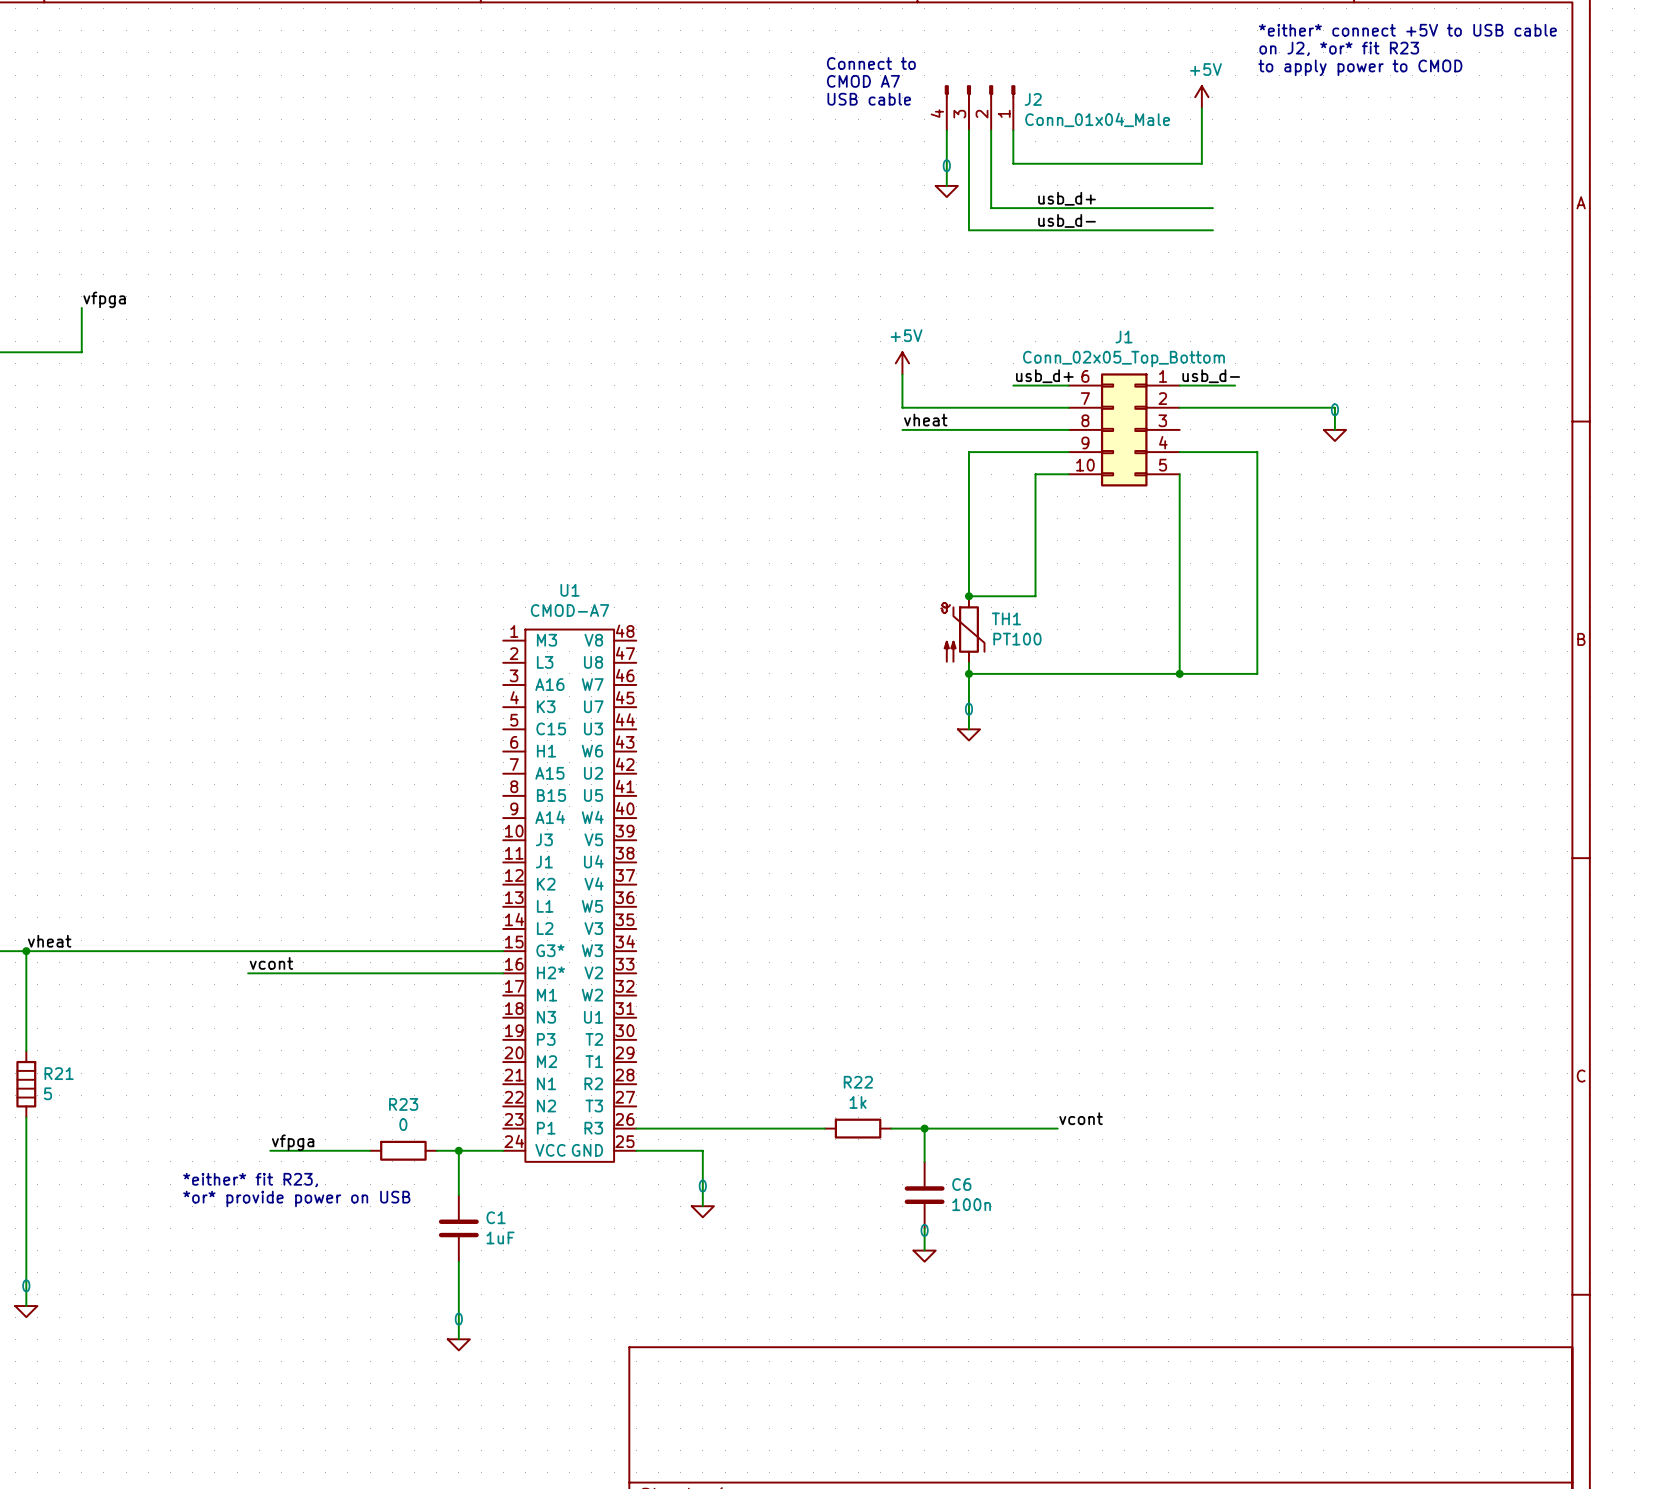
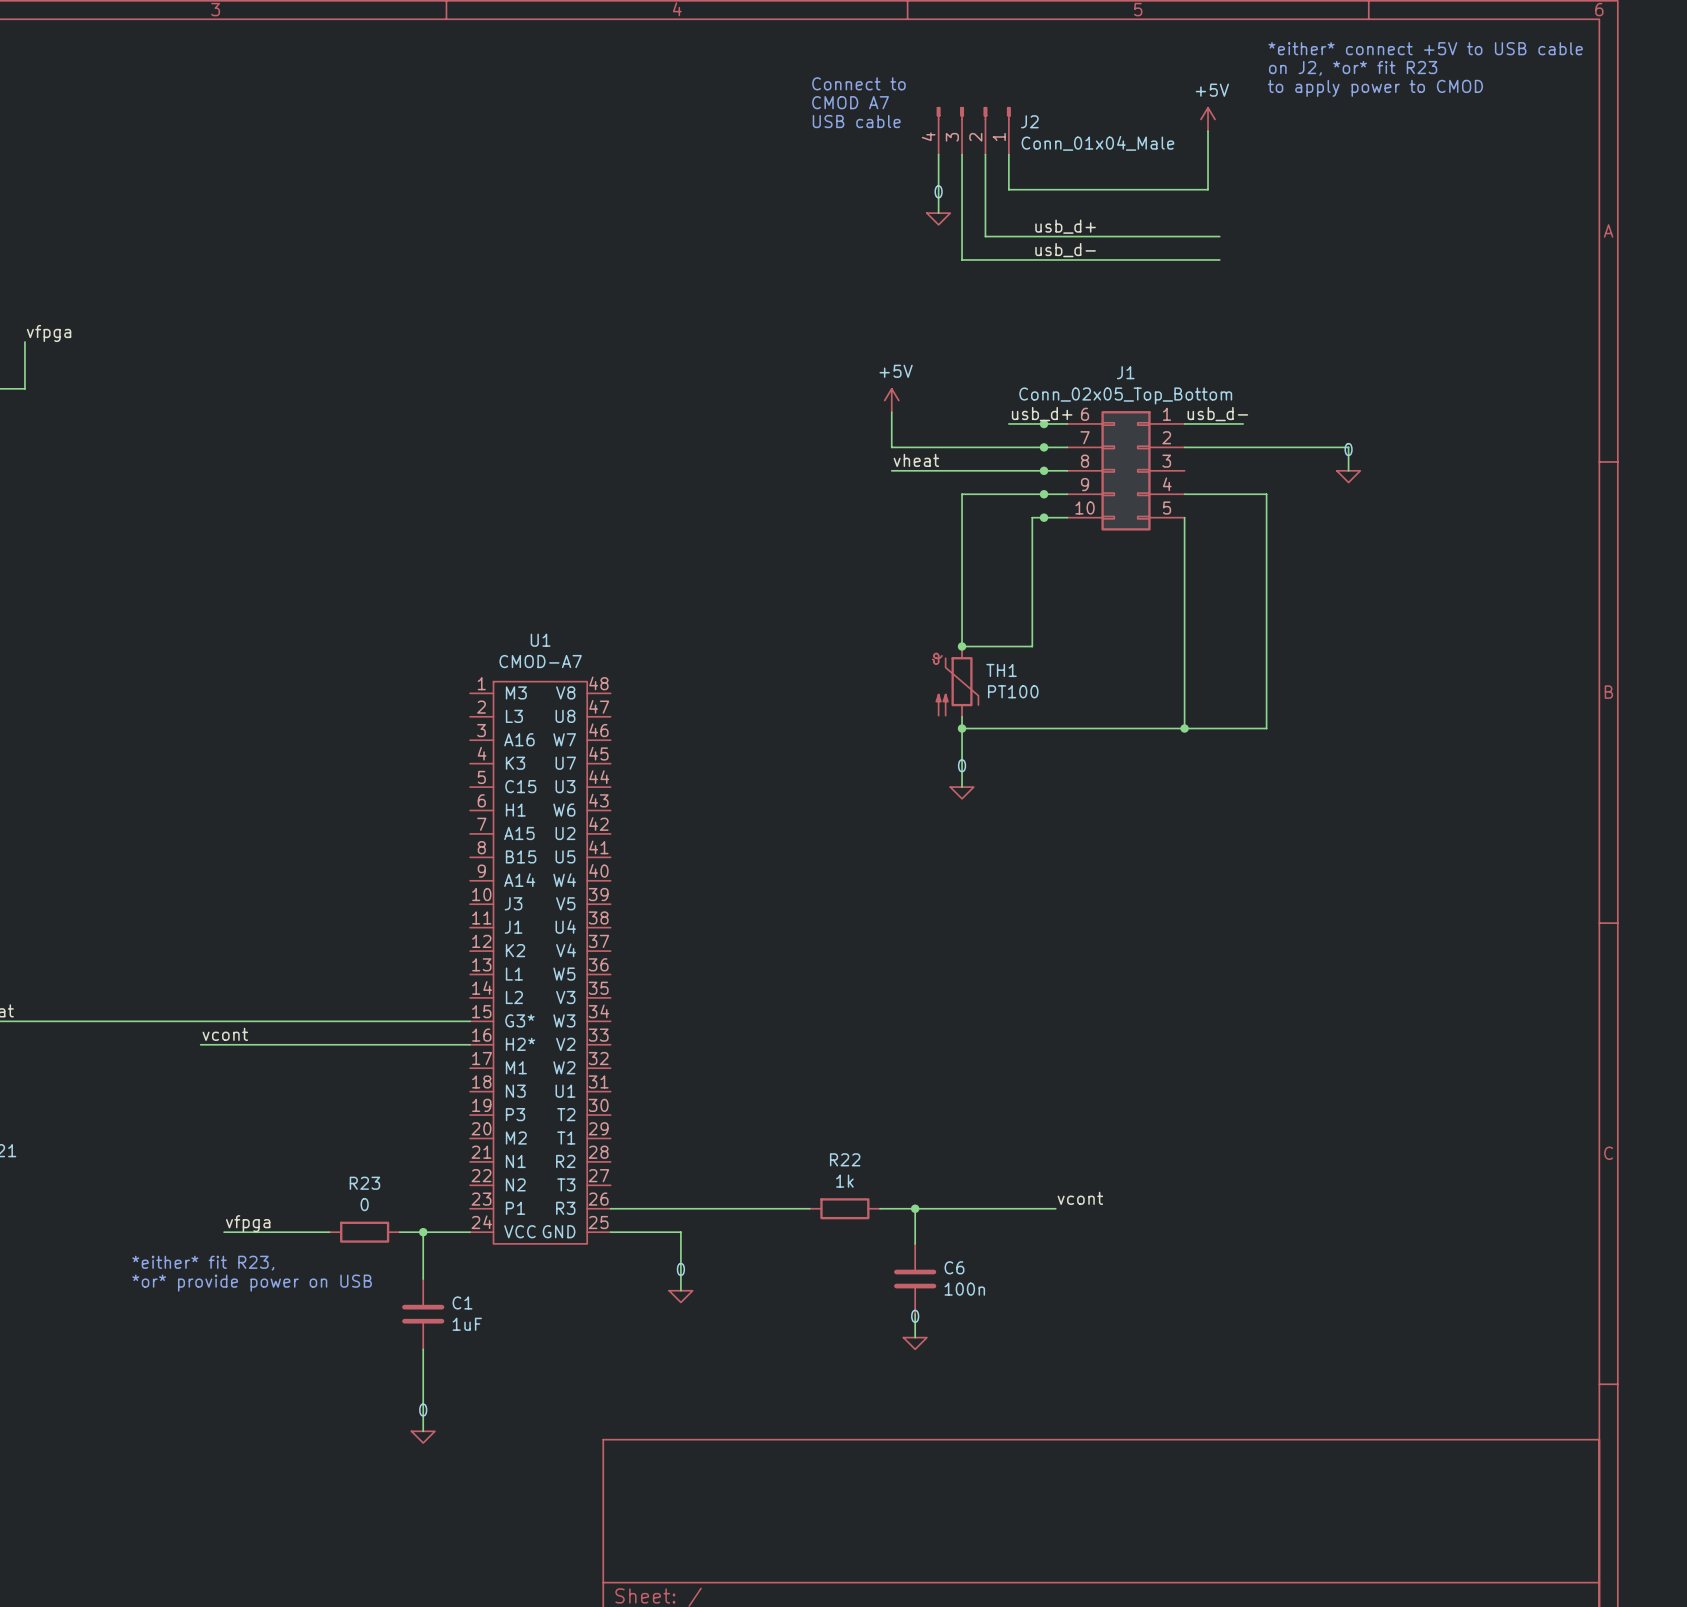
junction: none -> (1044, 423)
junction: none -> (1044, 447)
junction: none -> (1044, 470)
junction: none -> (1044, 494)
junction: none -> (1044, 517)

